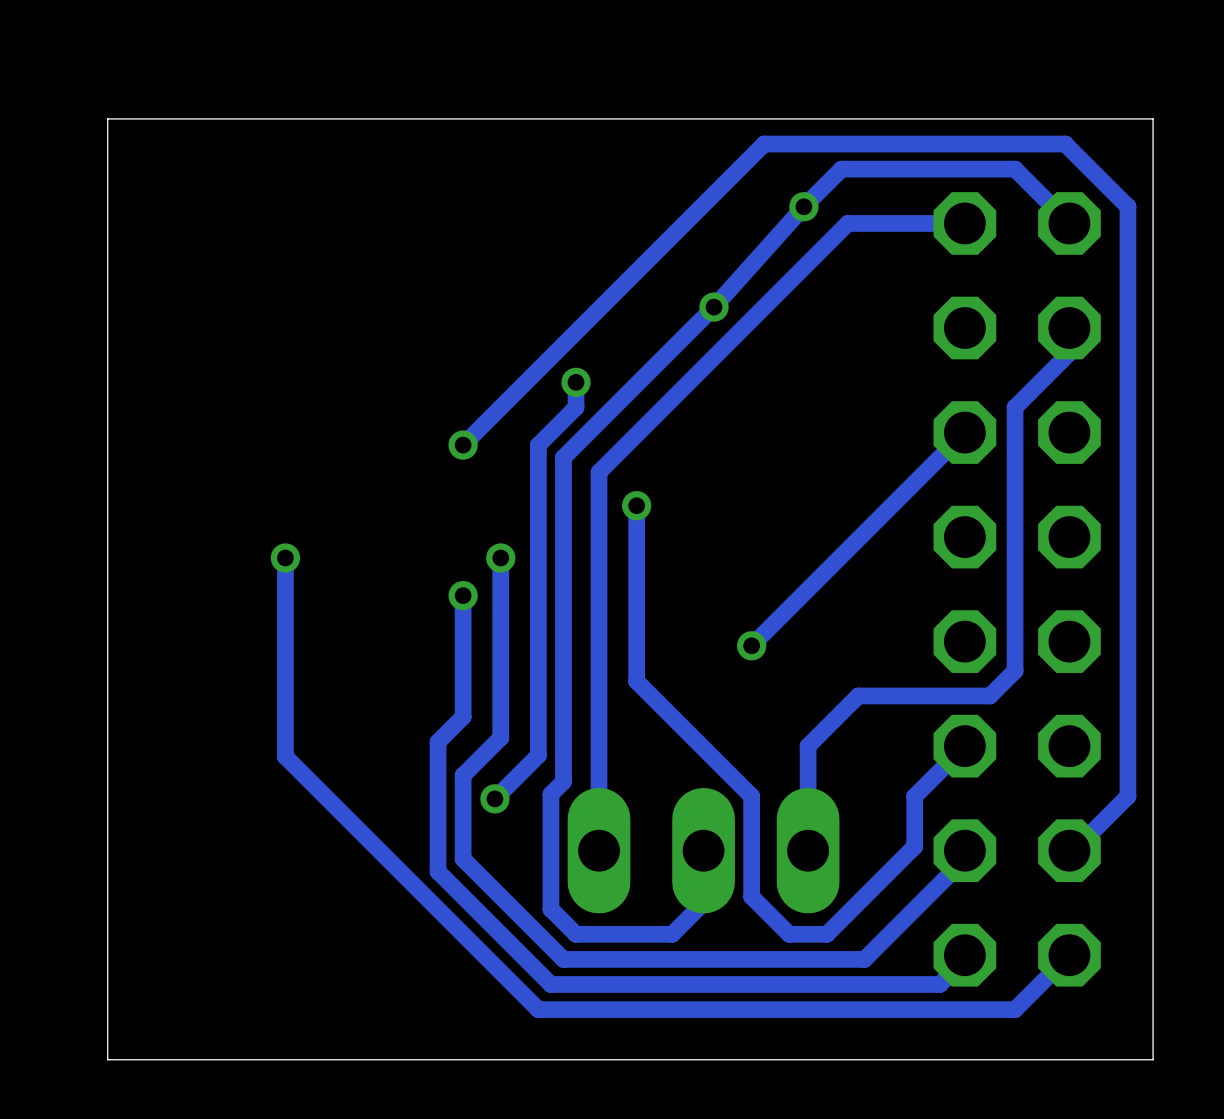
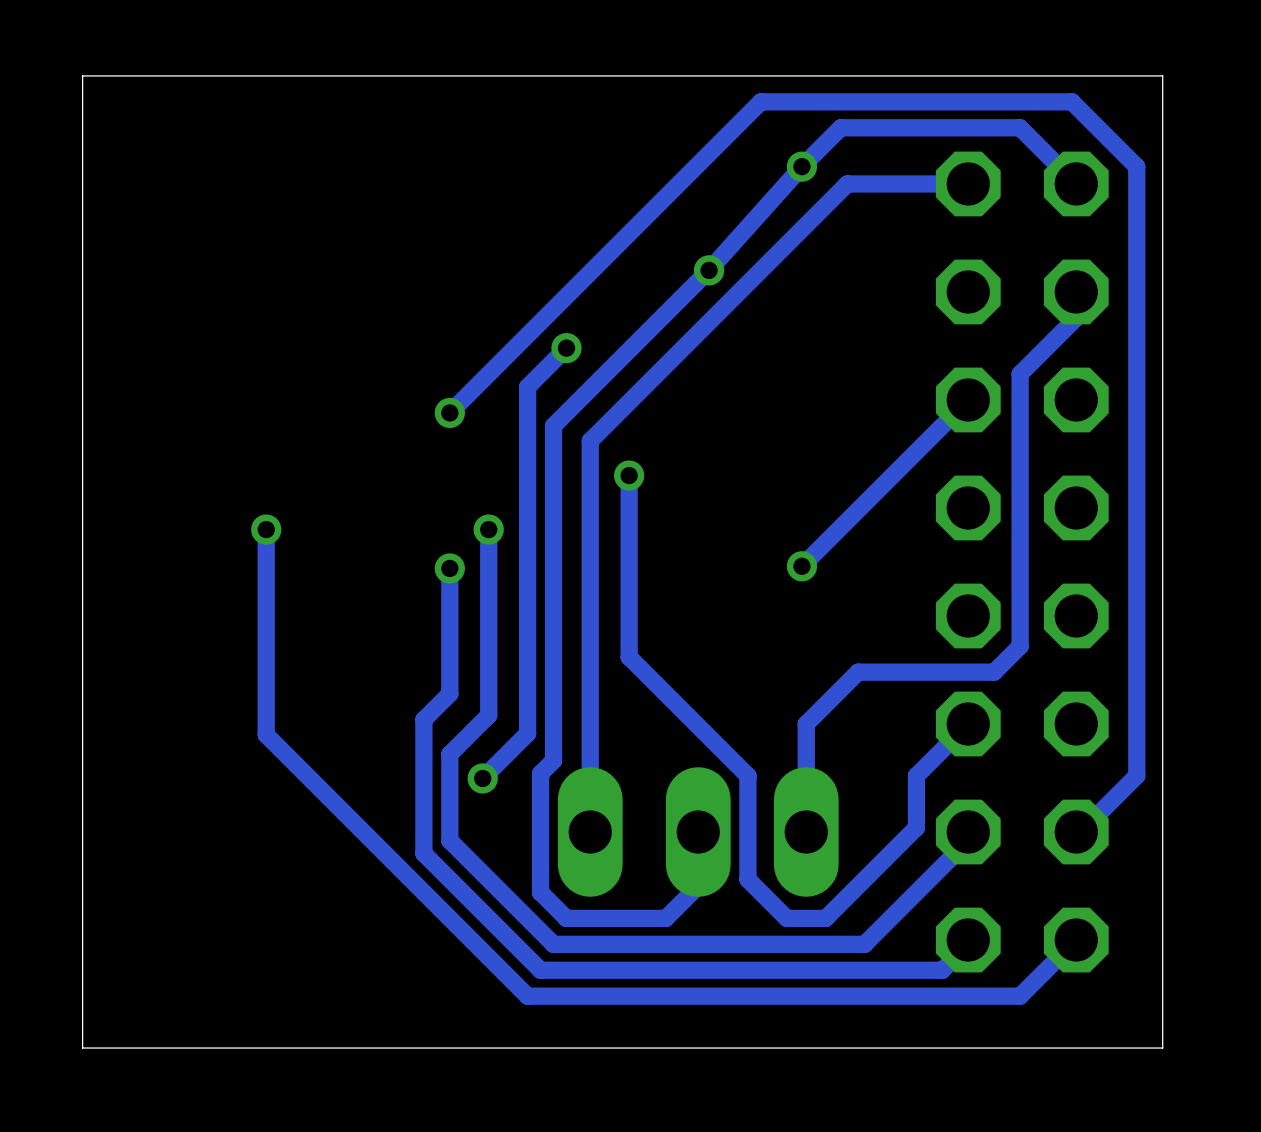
track: (576, 382) (576, 407) (538, 445) -> (566, 348) (527, 387) (527, 412)
track: (803, 593) (751, 645) -> none
via position: (751, 645) -> (801, 566)

